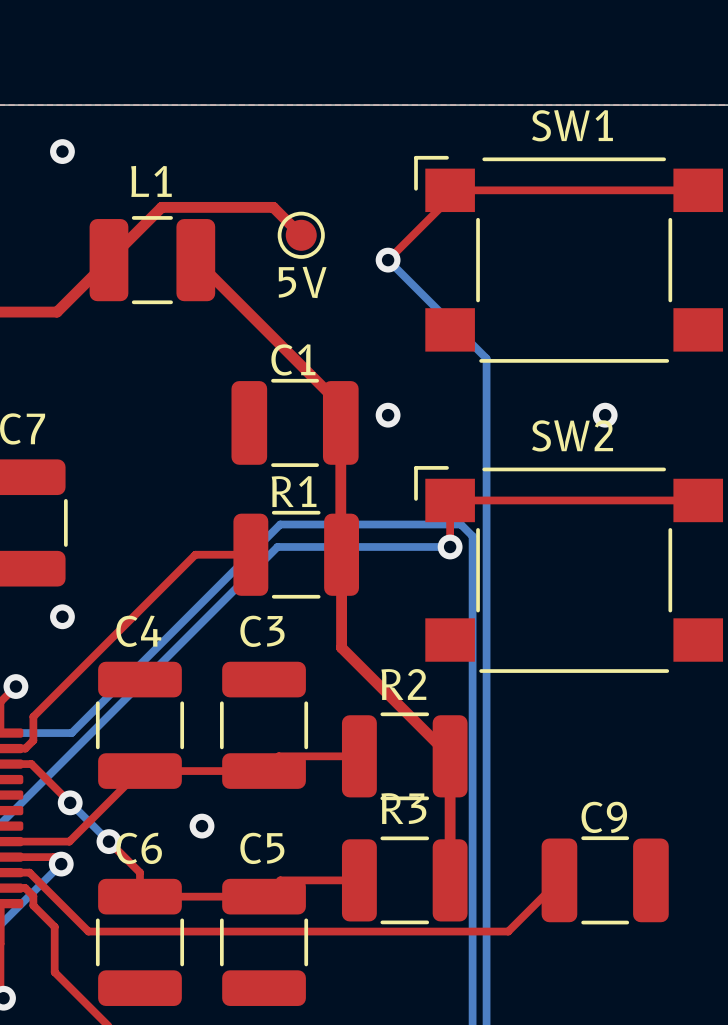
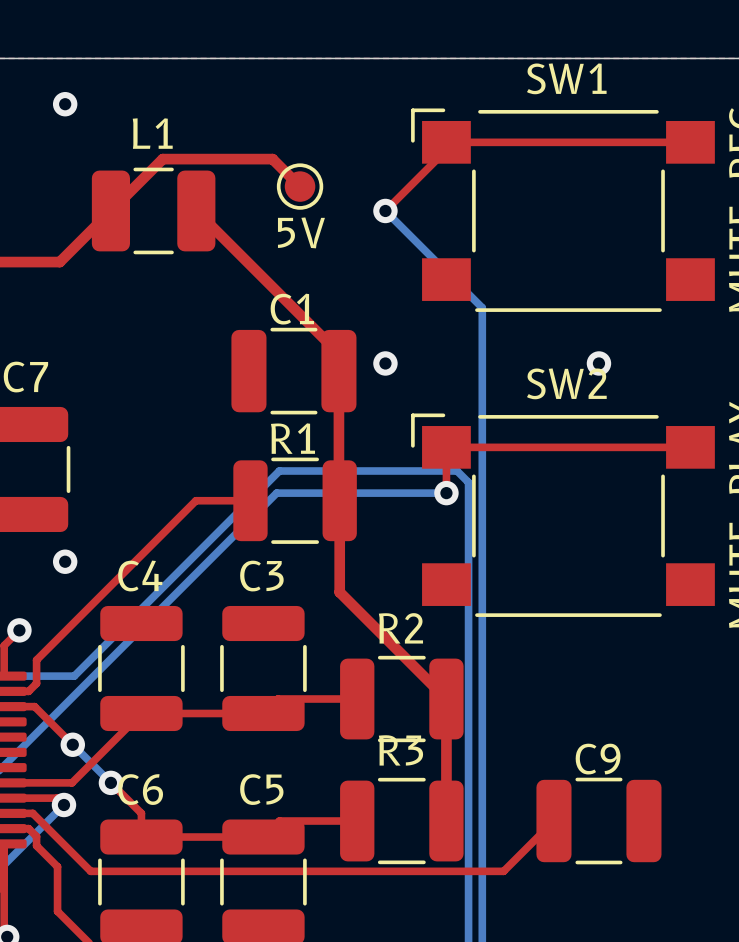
via: (202, 826) -> none

